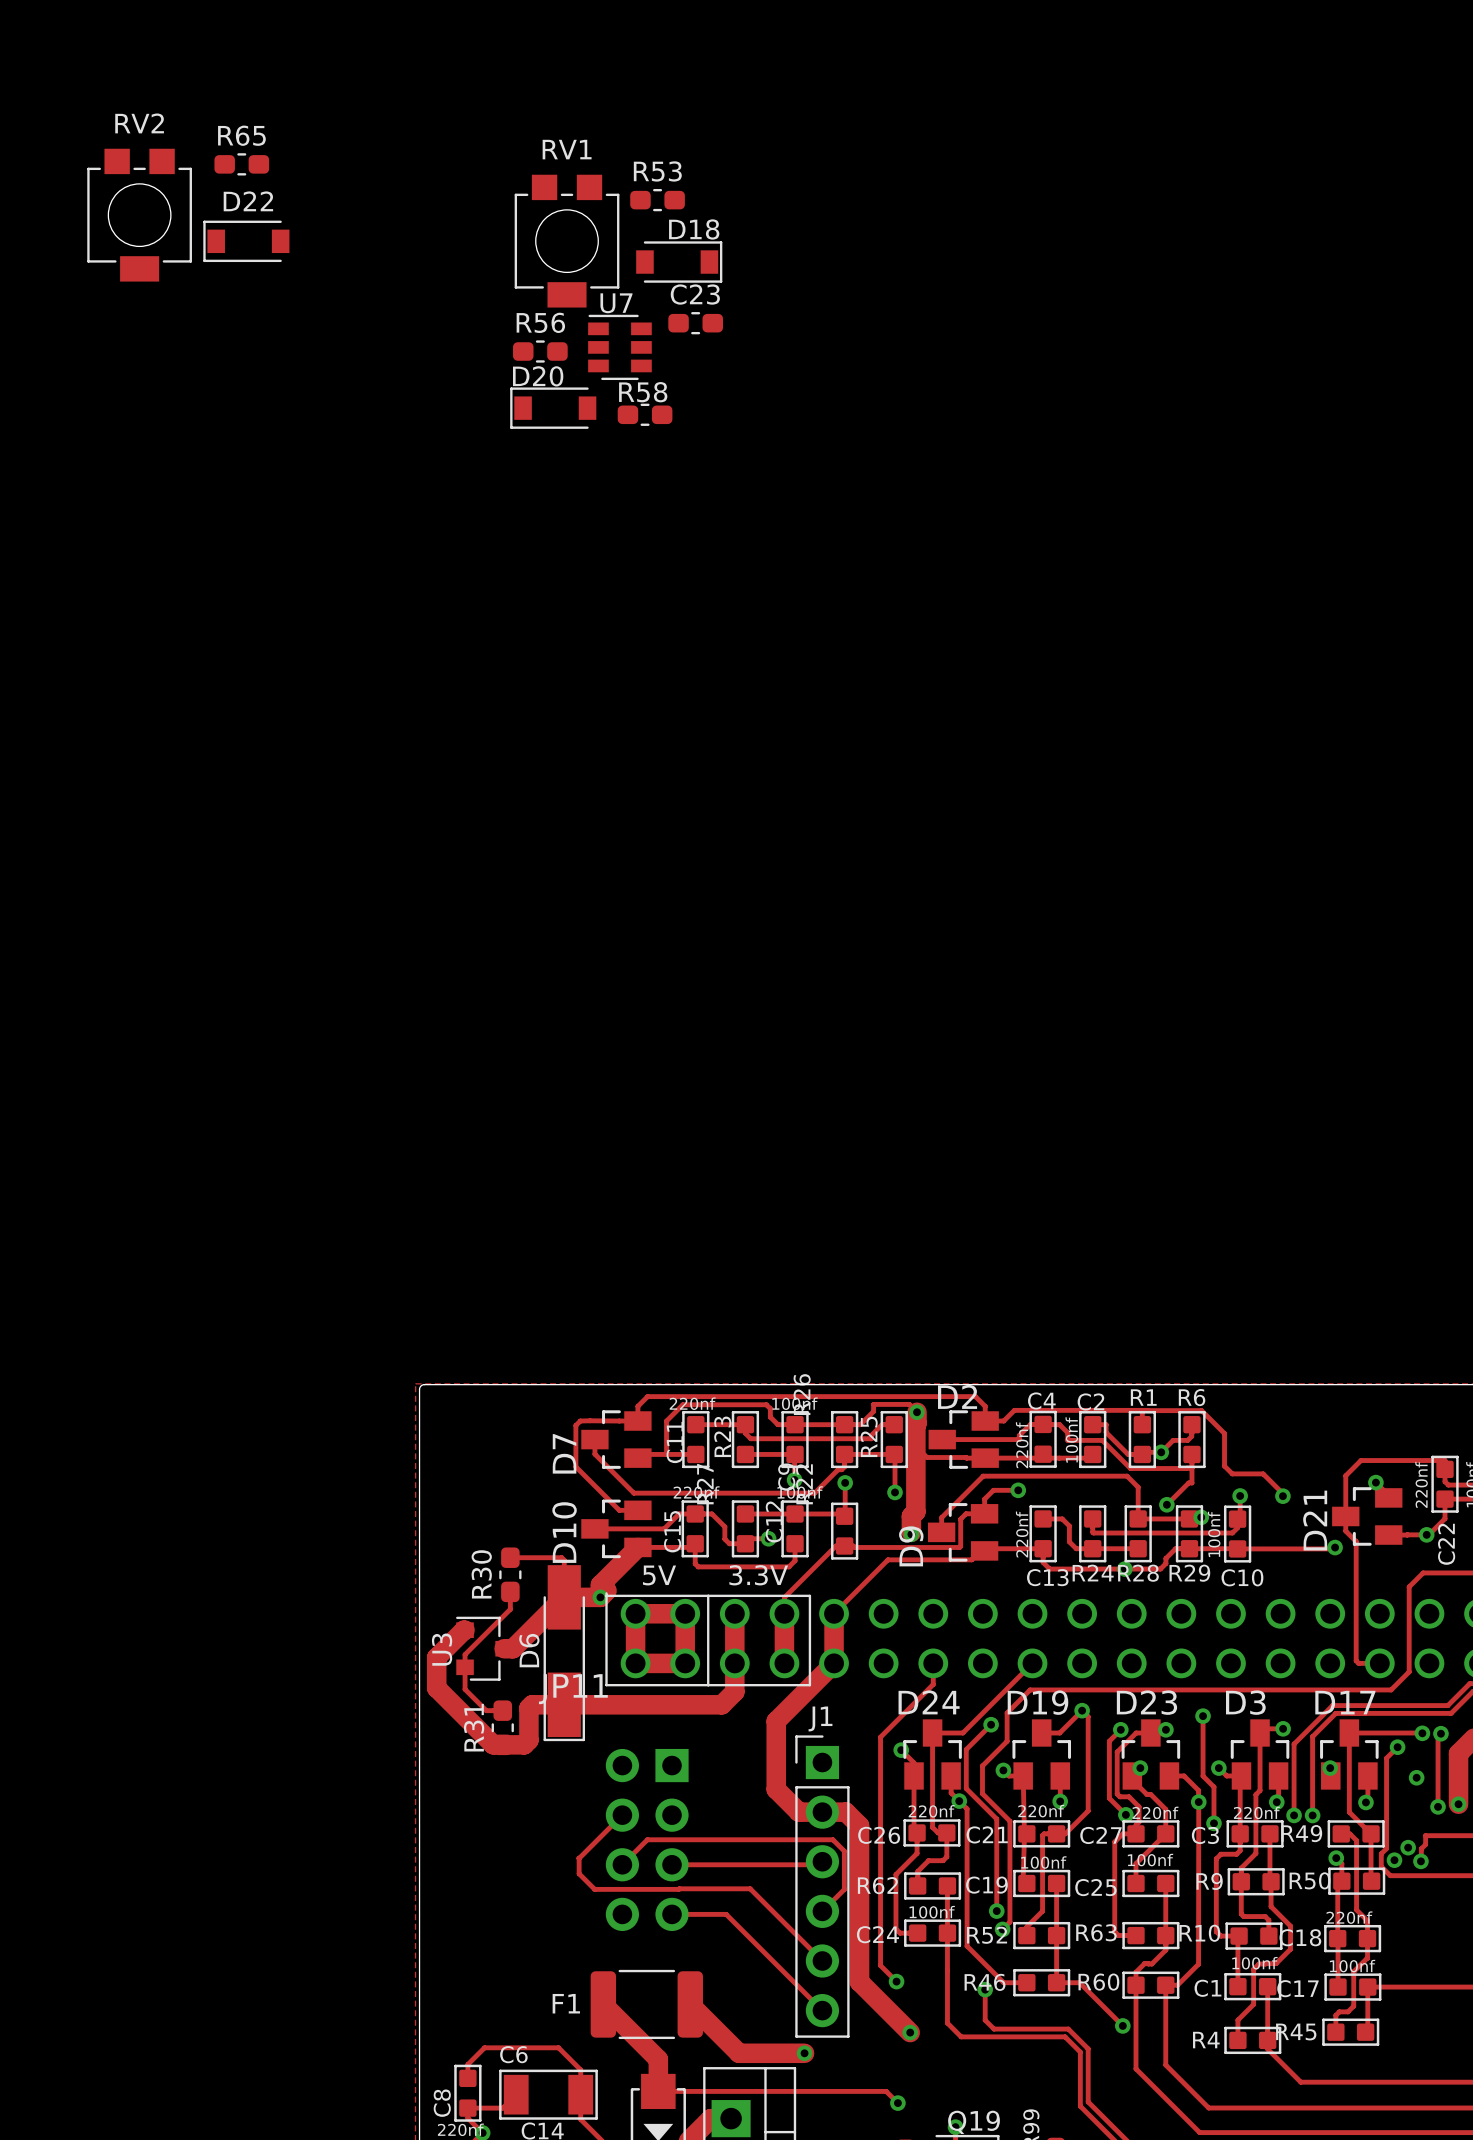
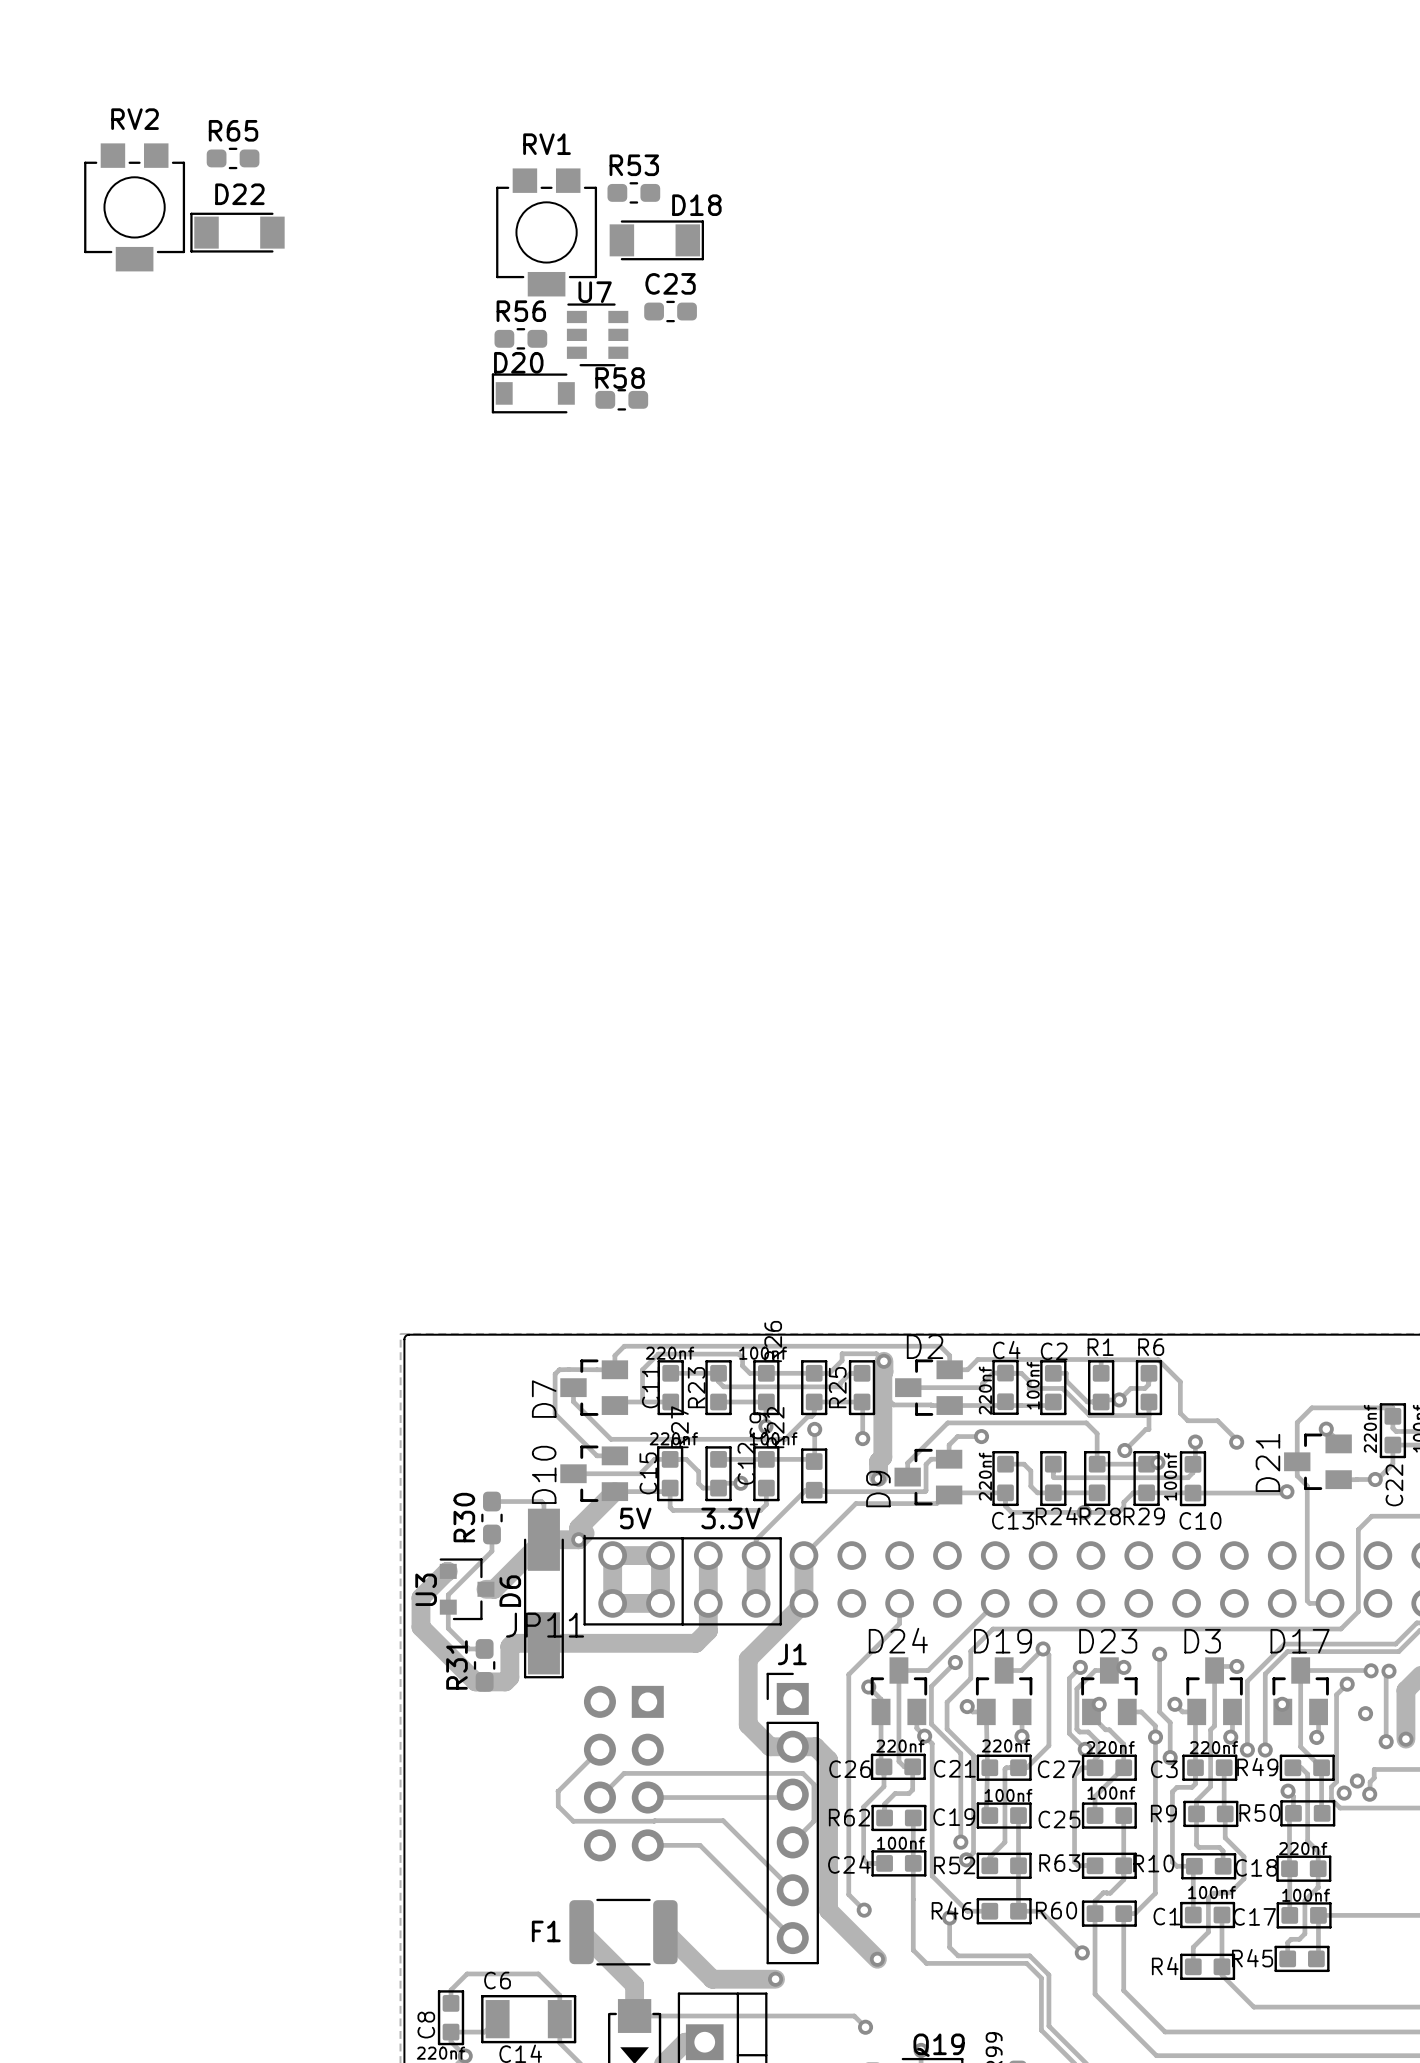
D22 footprint: [203, 220, 290, 263] -> [190, 212, 285, 253]
D18 name position: D18 (694, 229) -> D18 (696, 205)
D18 footprint: [636, 241, 723, 283] -> [609, 220, 704, 261]

